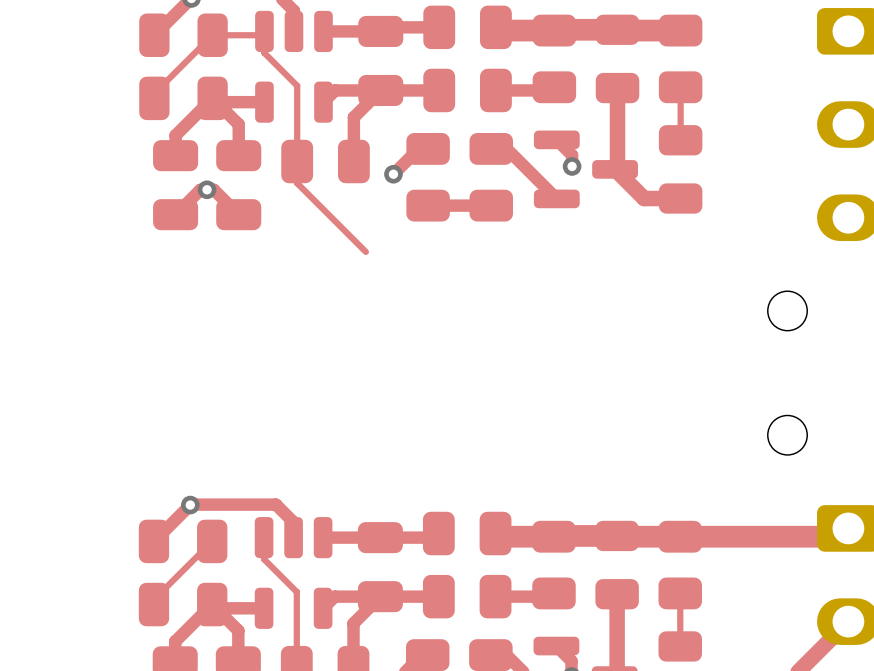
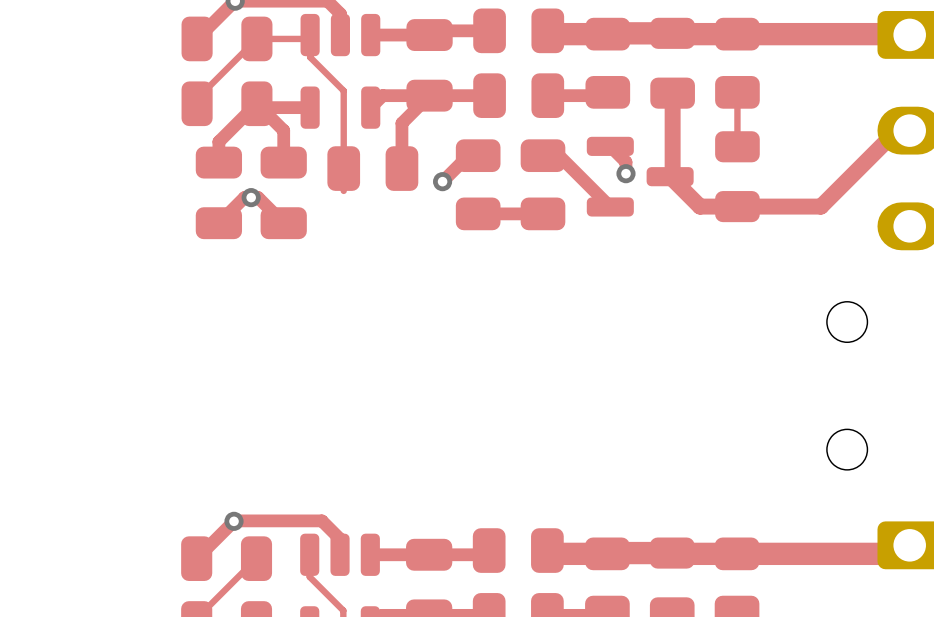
top track: none -> (737, 34) (909, 34)
top track: none -> (909, 130) (896, 130) (820, 206) (737, 206)
top track: (297, 183) (365, 251) -> none

